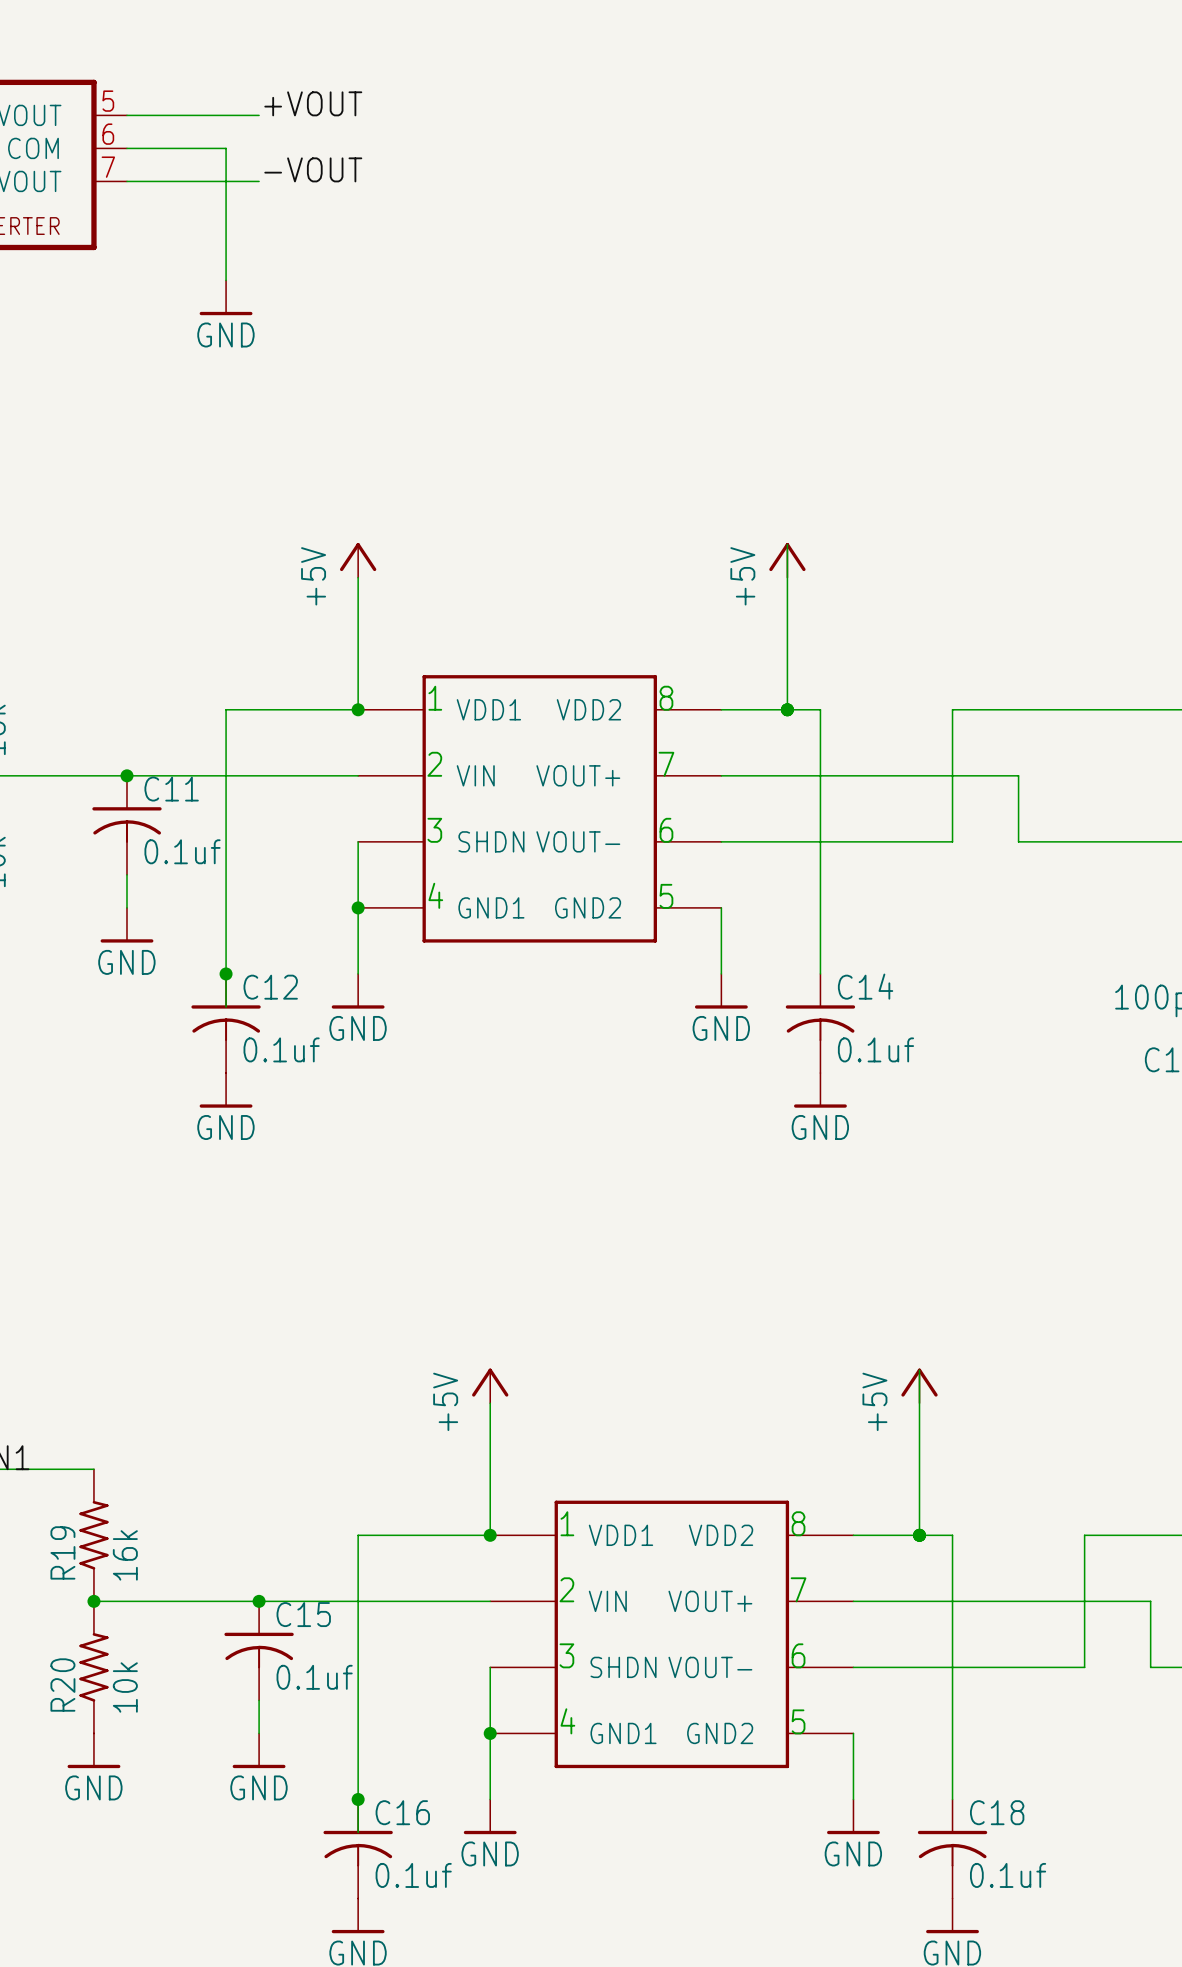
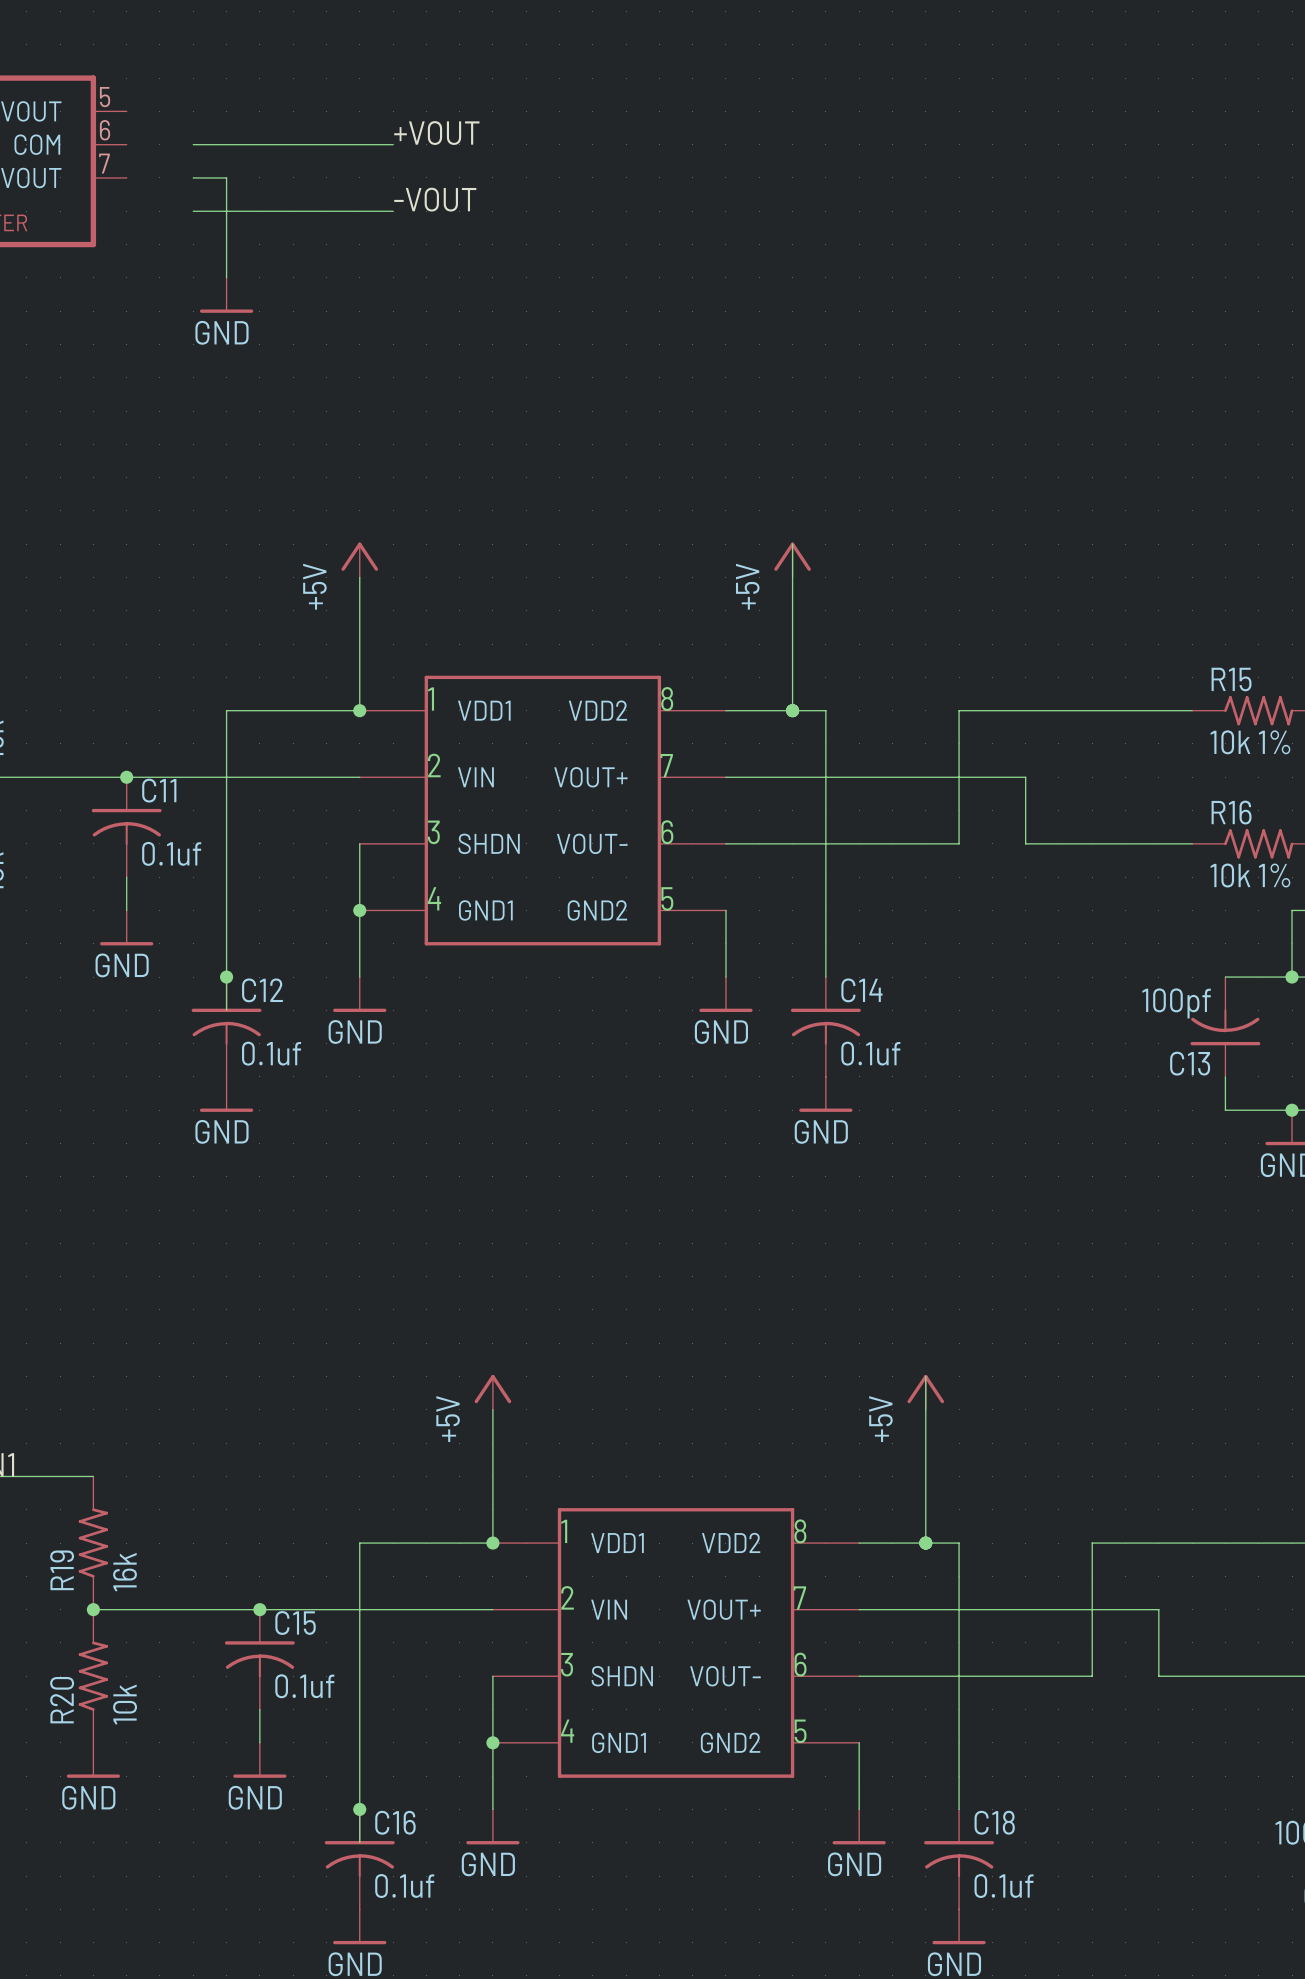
label position: +VOUT (313, 103) -> +VOUT (436, 133)
wire: (126, 115) (259, 115) -> none
wire: (126, 148) (193, 148) -> none
wire: (226, 148) (226, 181) (259, 181) -> (226, 144) (393, 144)
label position: -VOUT (313, 169) -> -VOUT (435, 199)
wire: (126, 181) (193, 181) -> none
wire: none -> (193, 211) (393, 211)

